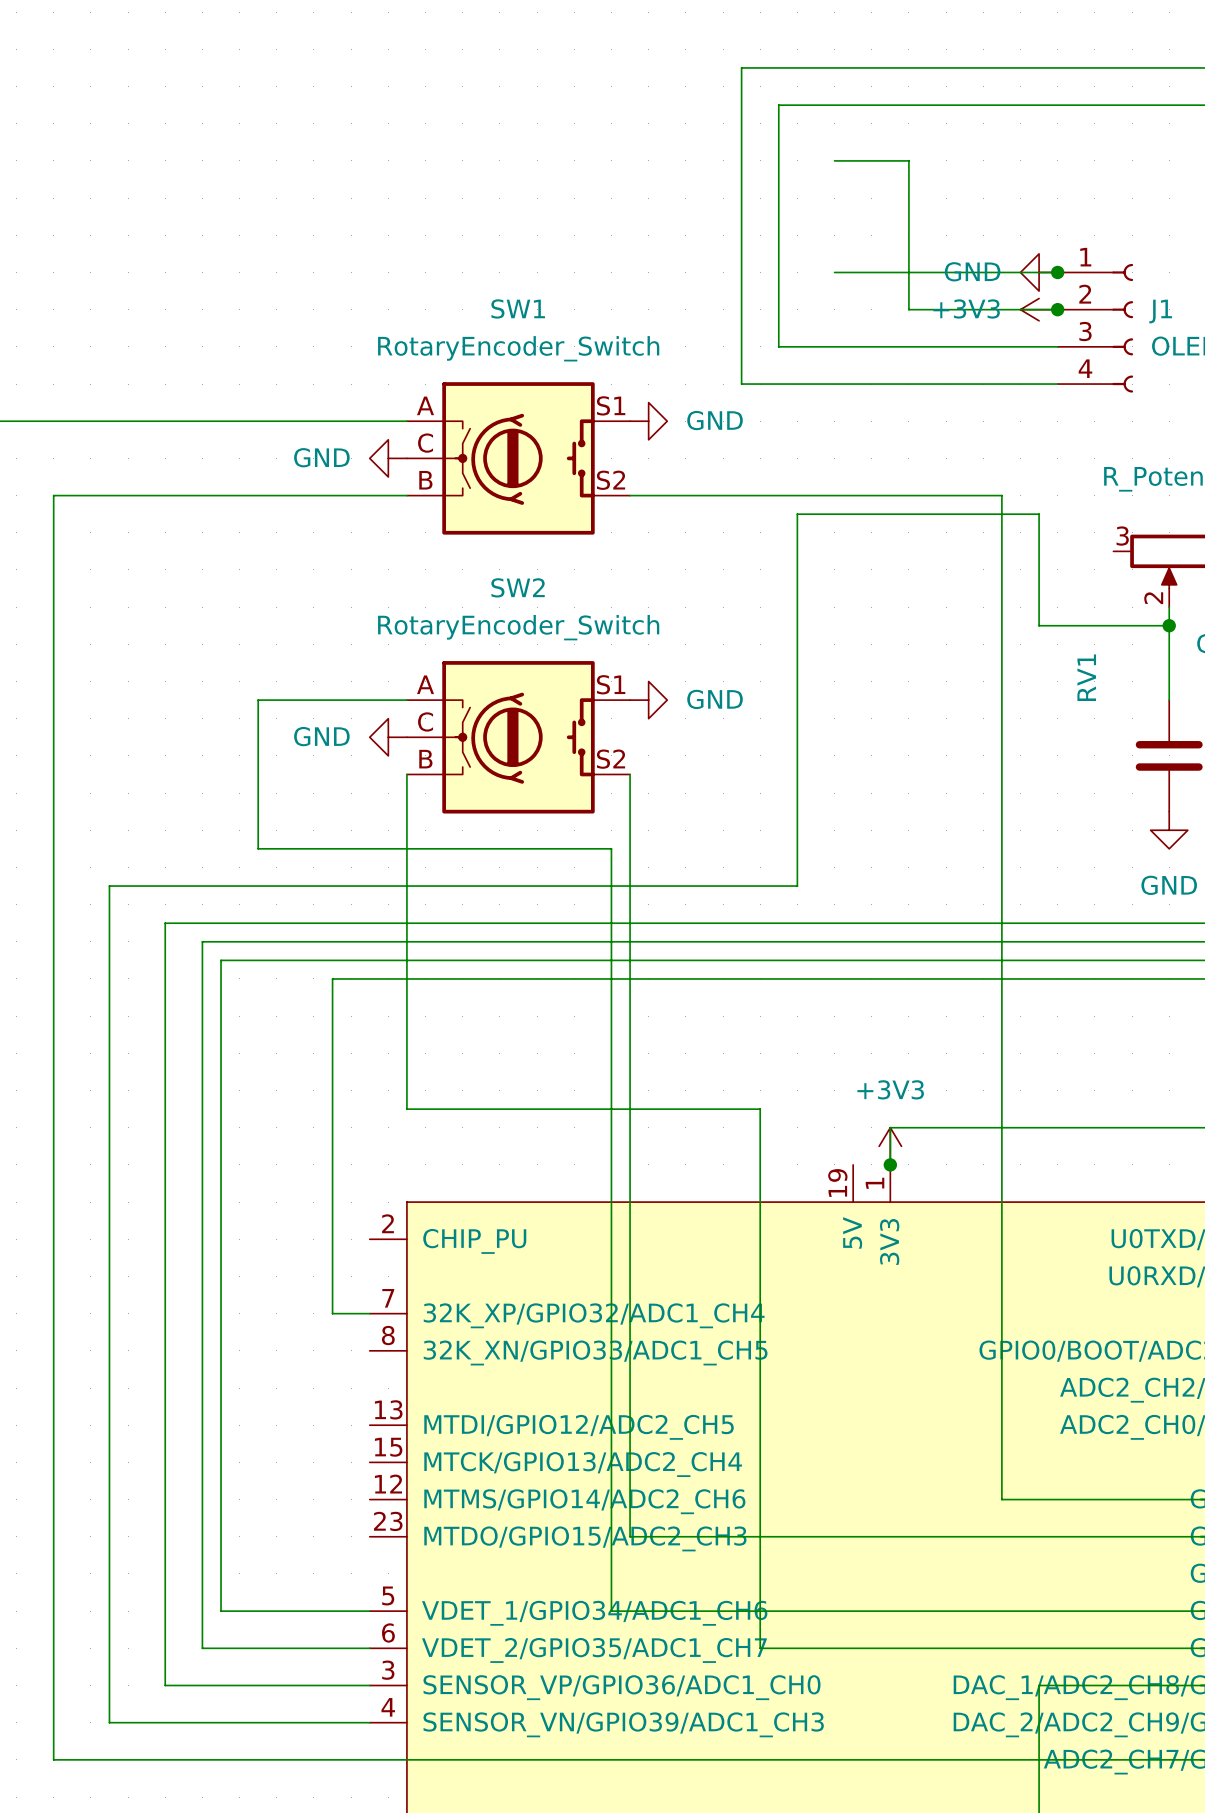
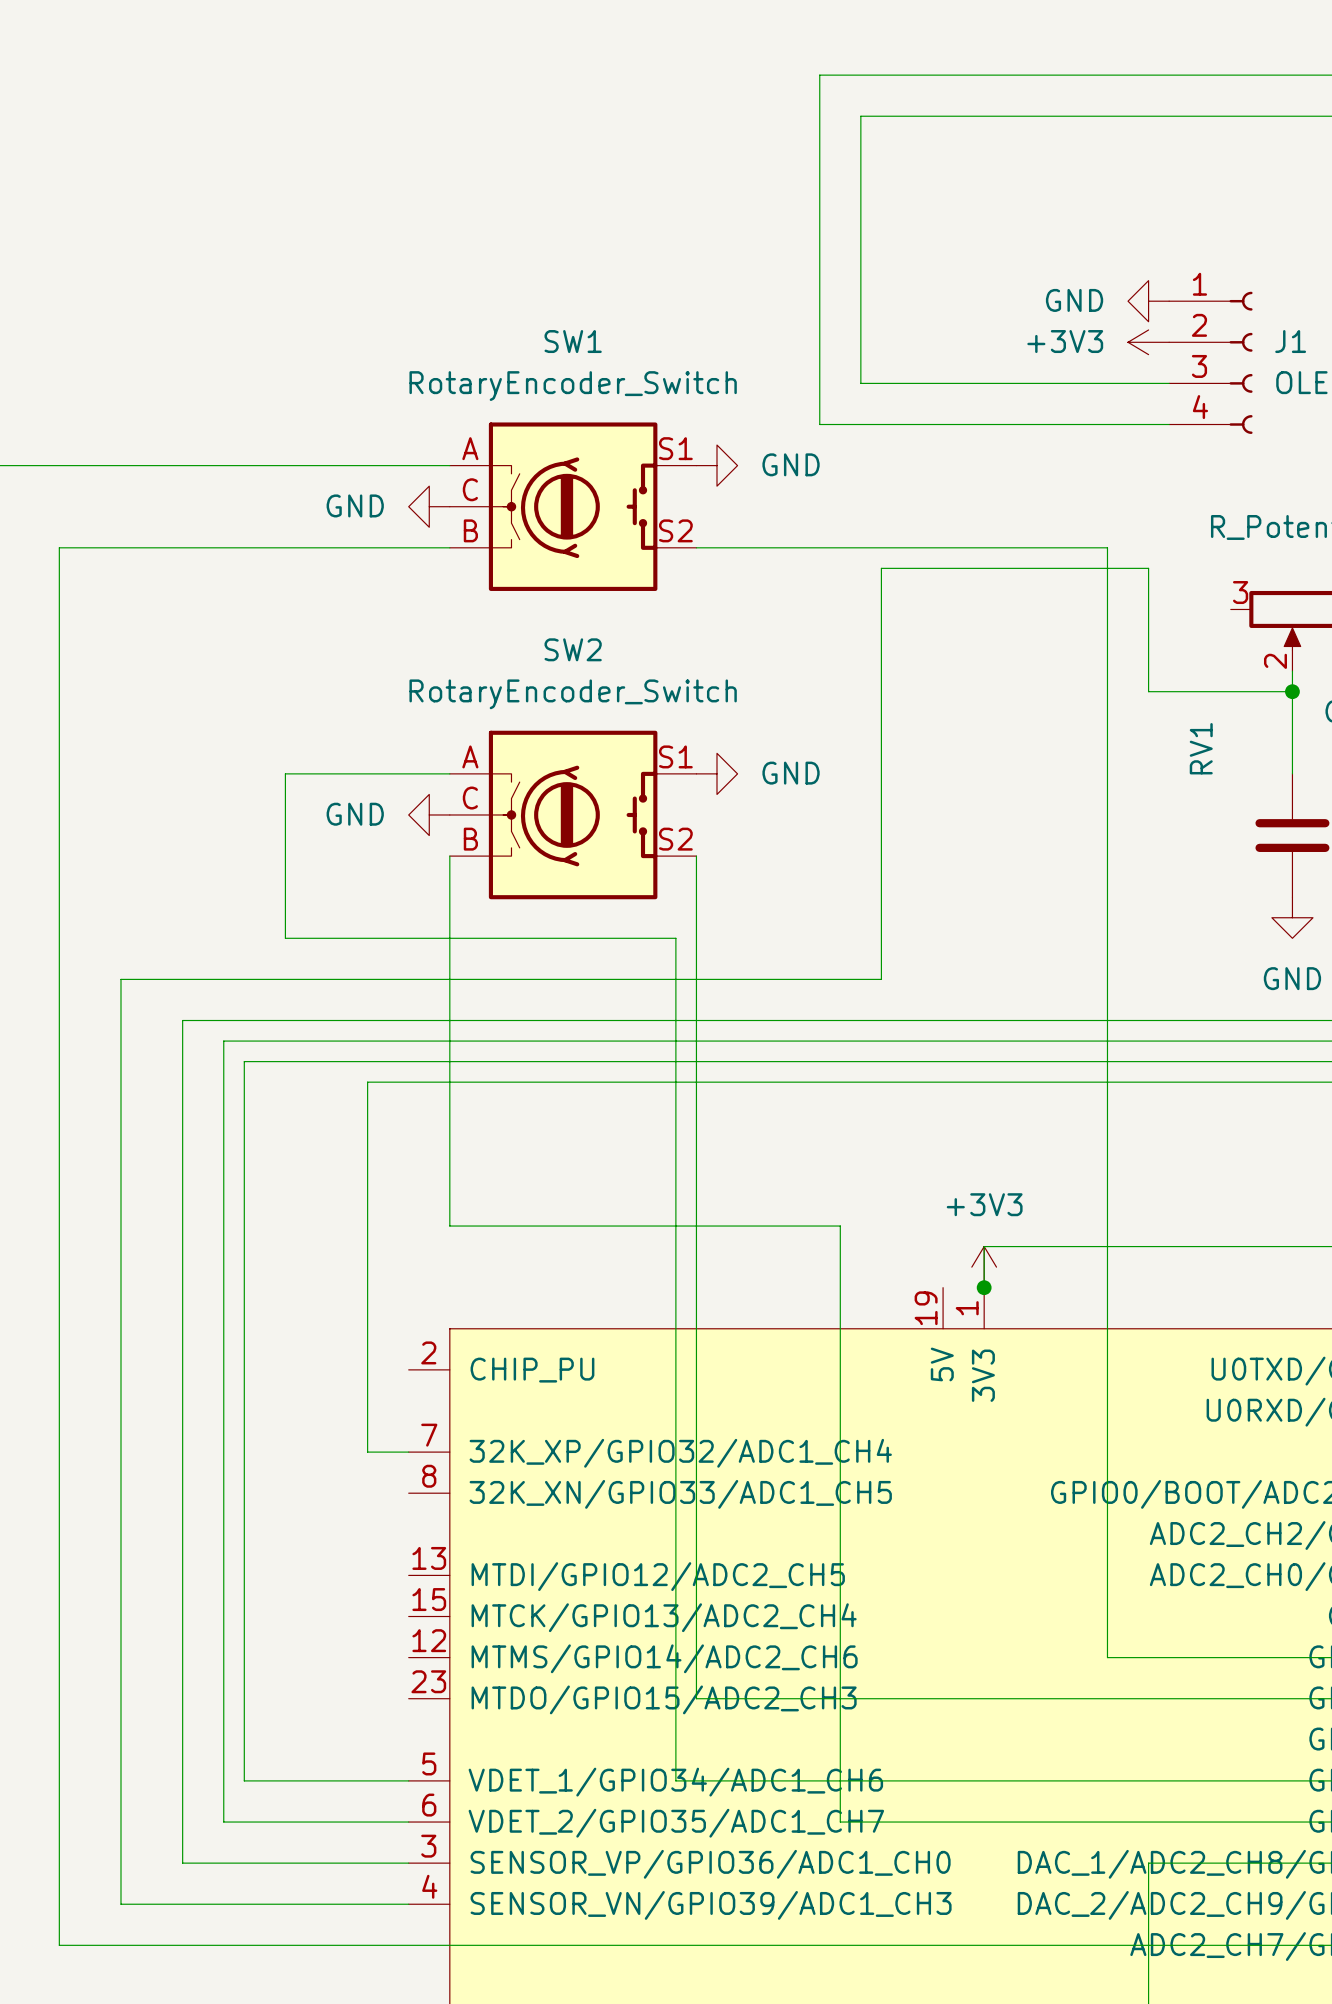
wire: (834, 160) (908, 160) (908, 309) (1057, 309) -> none
wire: (834, 272) (1057, 272) -> none
junction: (1057, 272) -> none
junction: (1057, 309) -> none

